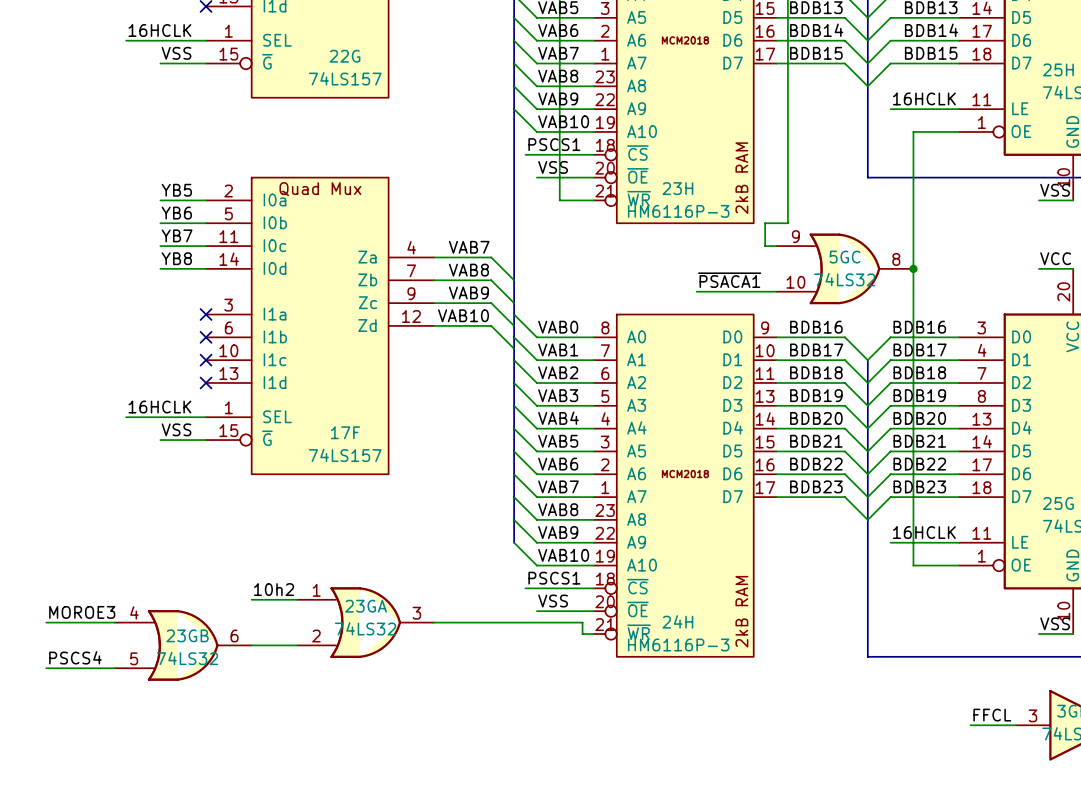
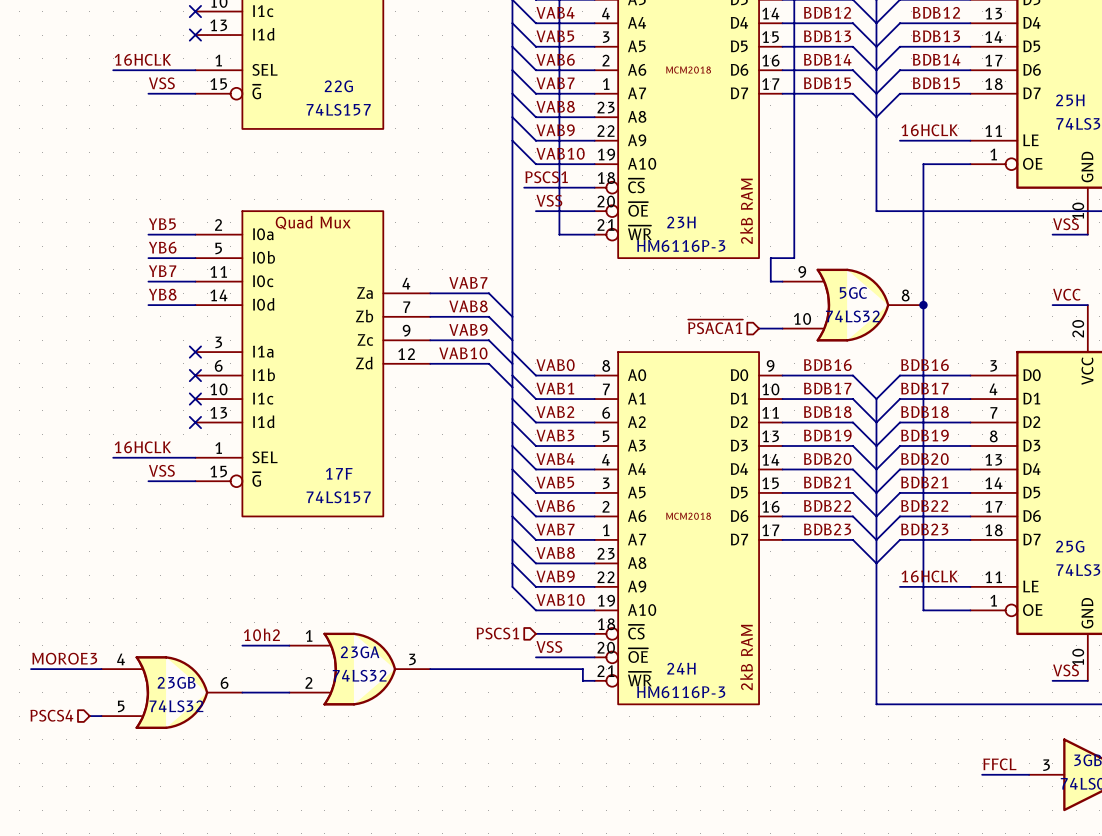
label: ~{PSACA1} (729, 280) -> none
hierarchical label: none -> ~{PSACA1} (715, 326)
wire: (696, 291) (753, 291) -> none
label: PSCS1 (554, 578) -> none
hierarchical label: none -> PSCS1 (497, 633)
wire: (525, 588) (536, 588) -> none
label: PSCS4 (75, 657) -> none
hierarchical label: none -> PSCS4 (51, 715)
wire: (46, 668) (103, 668) -> none

